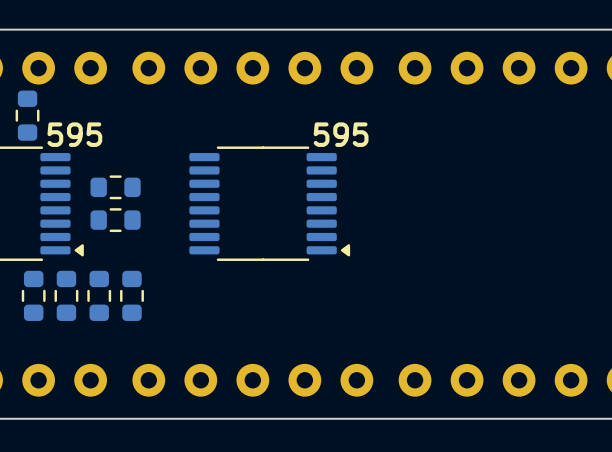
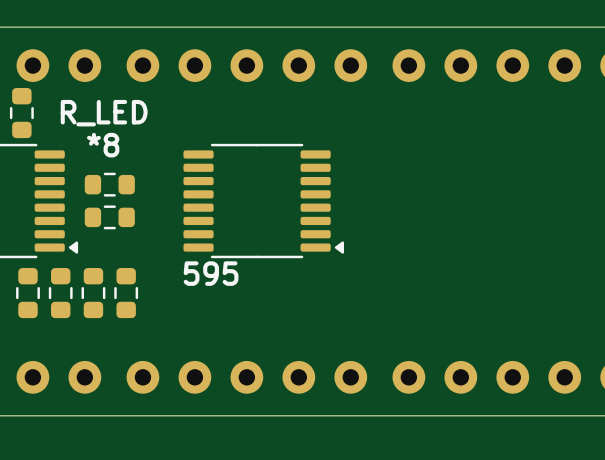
text: none -> R_LED (104, 113)
text: 595 (74, 134) -> none
text: 595 (341, 134) -> none
text: none -> *8 (103, 145)
text: none -> 595 (211, 273)

